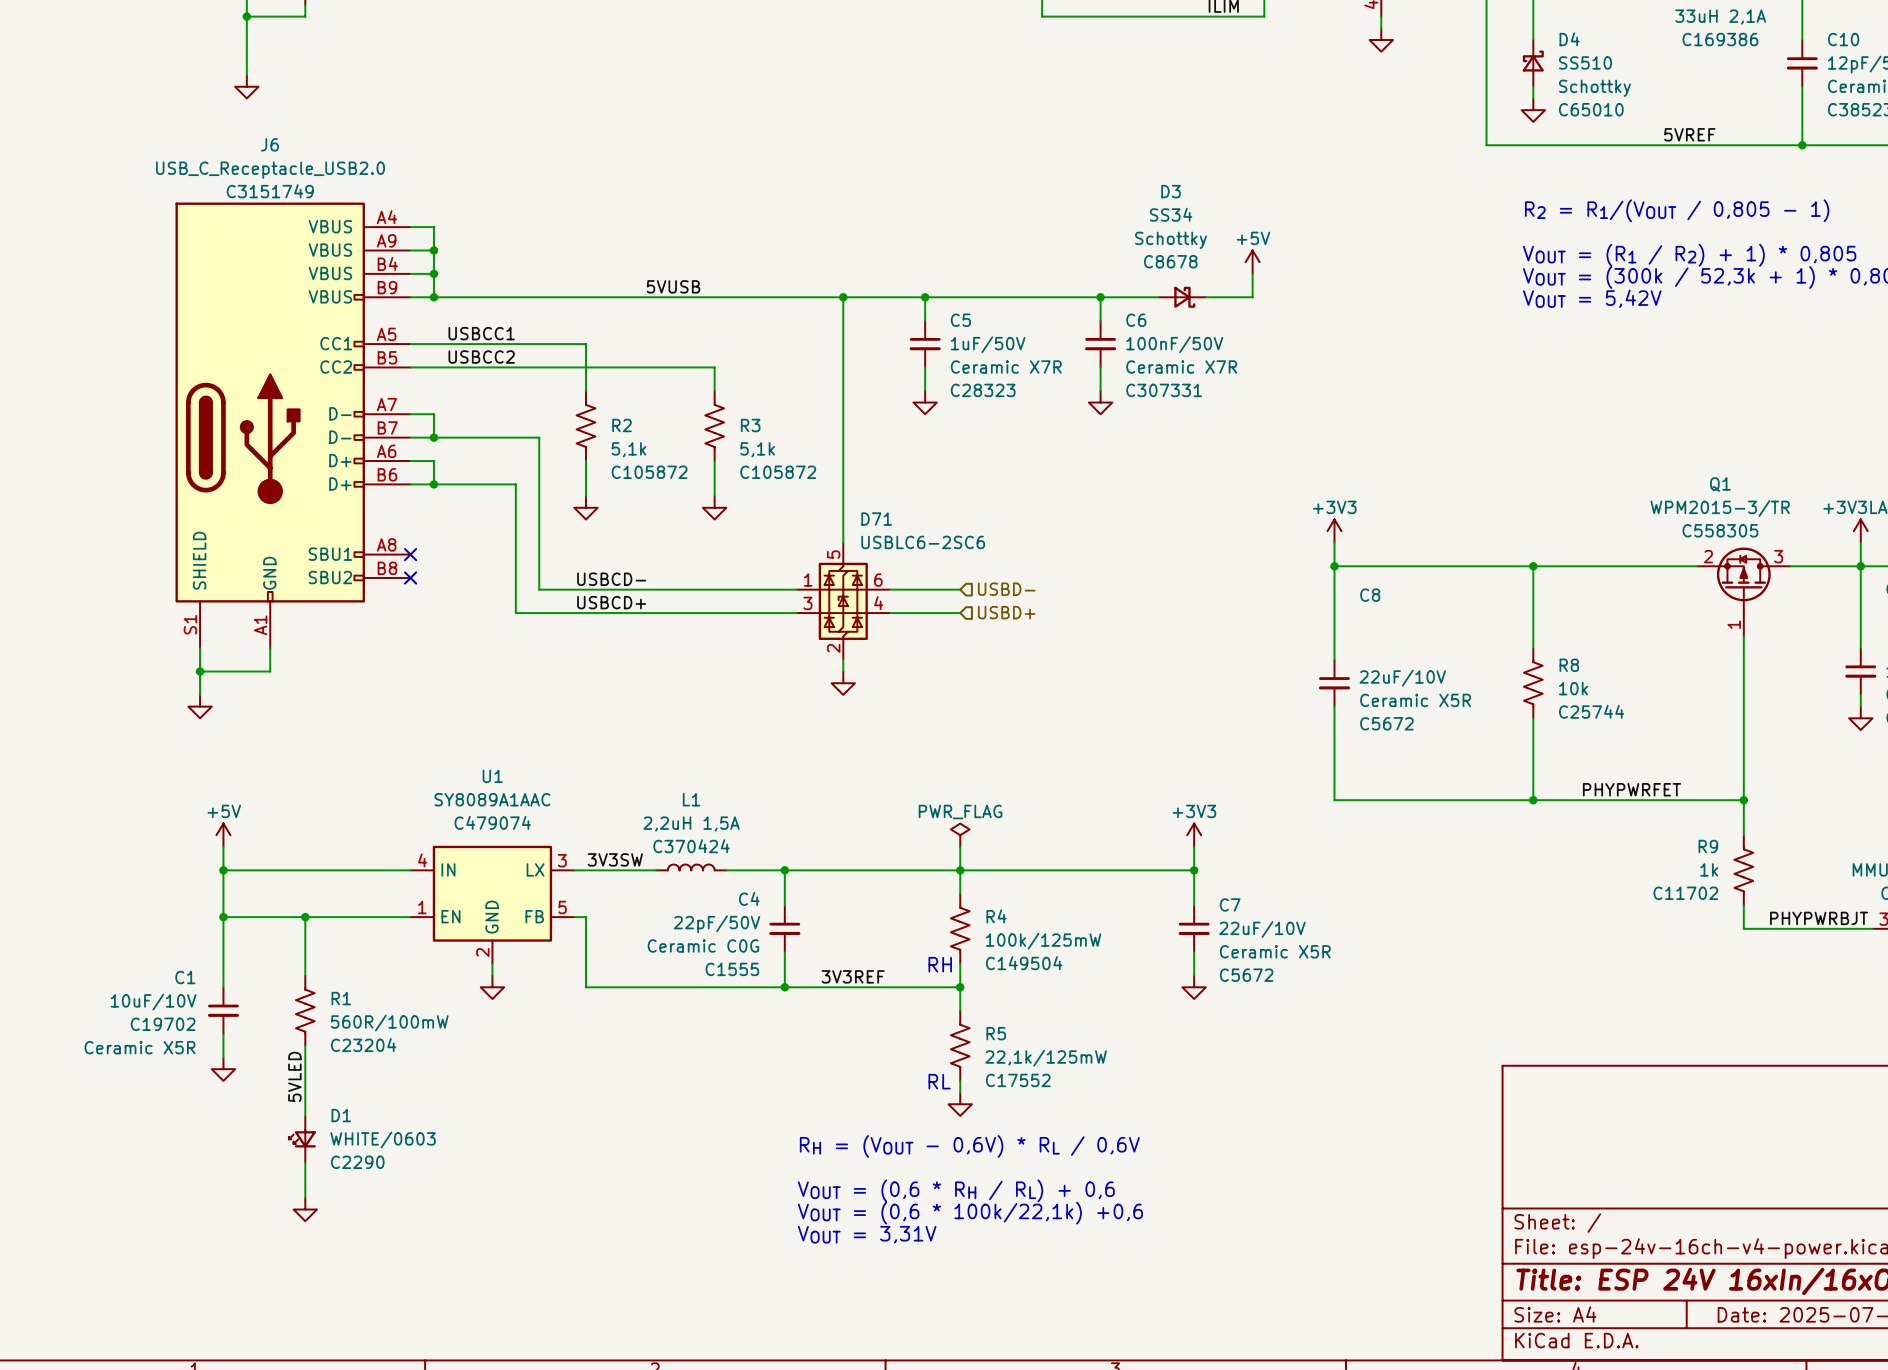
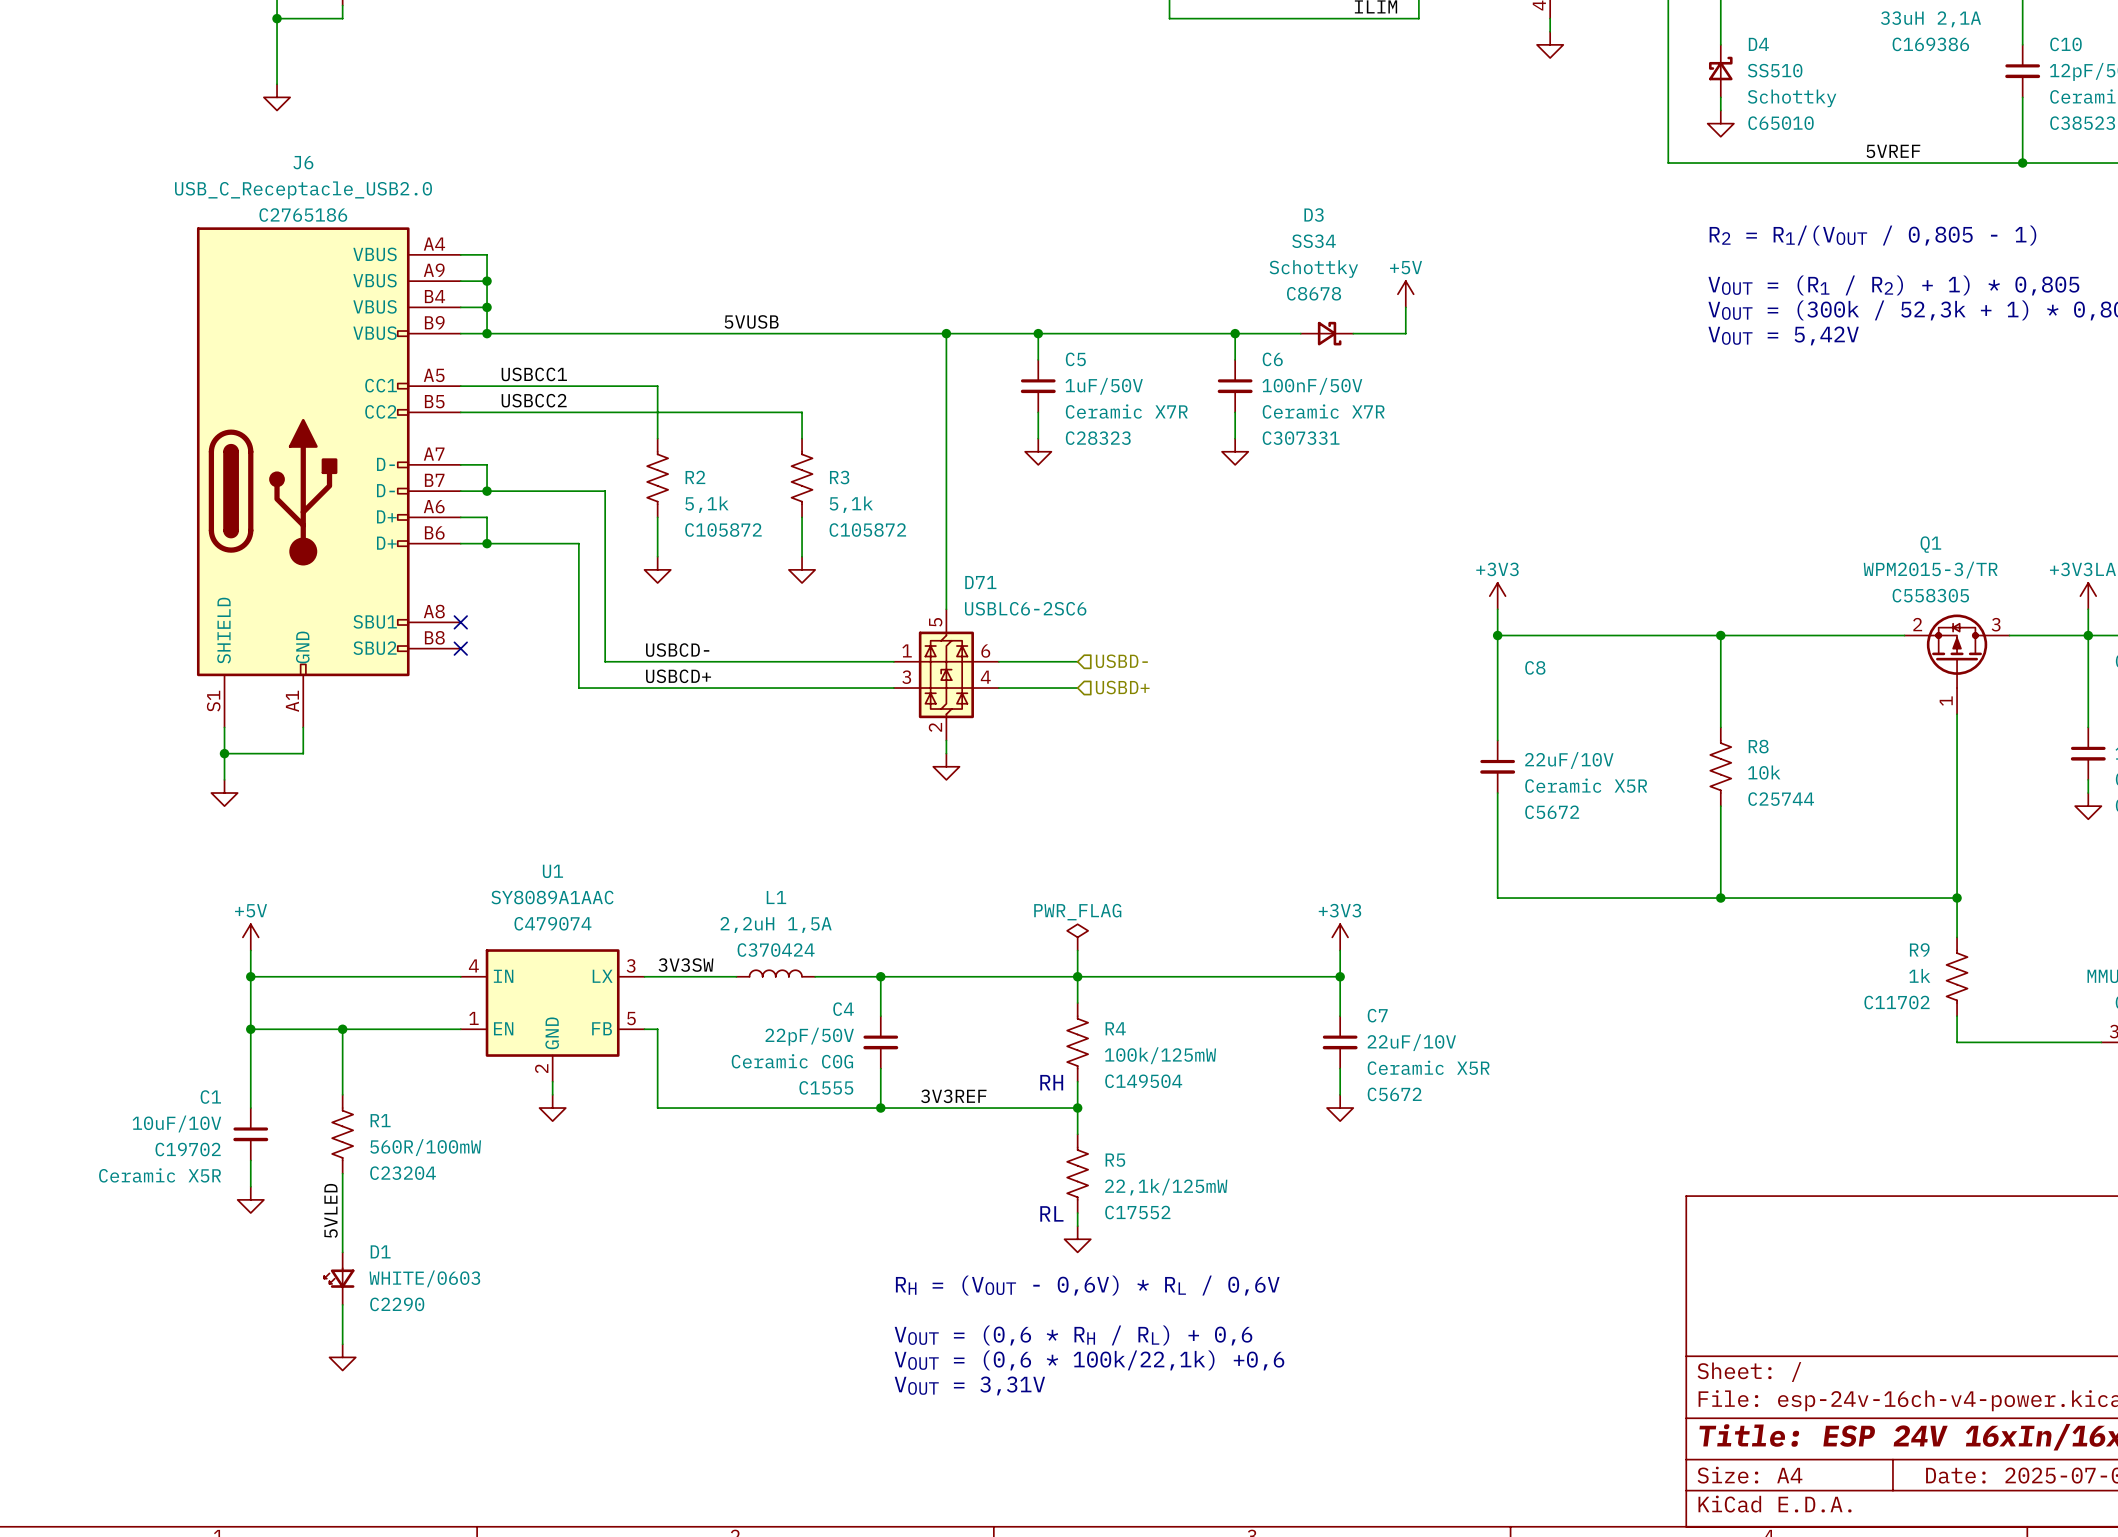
J6 text: C3151749 (270, 191) -> C2765186 (303, 215)
label: PHYPWRFET (1631, 789) -> none
label: PHYPWRBJT (1819, 918) -> none

